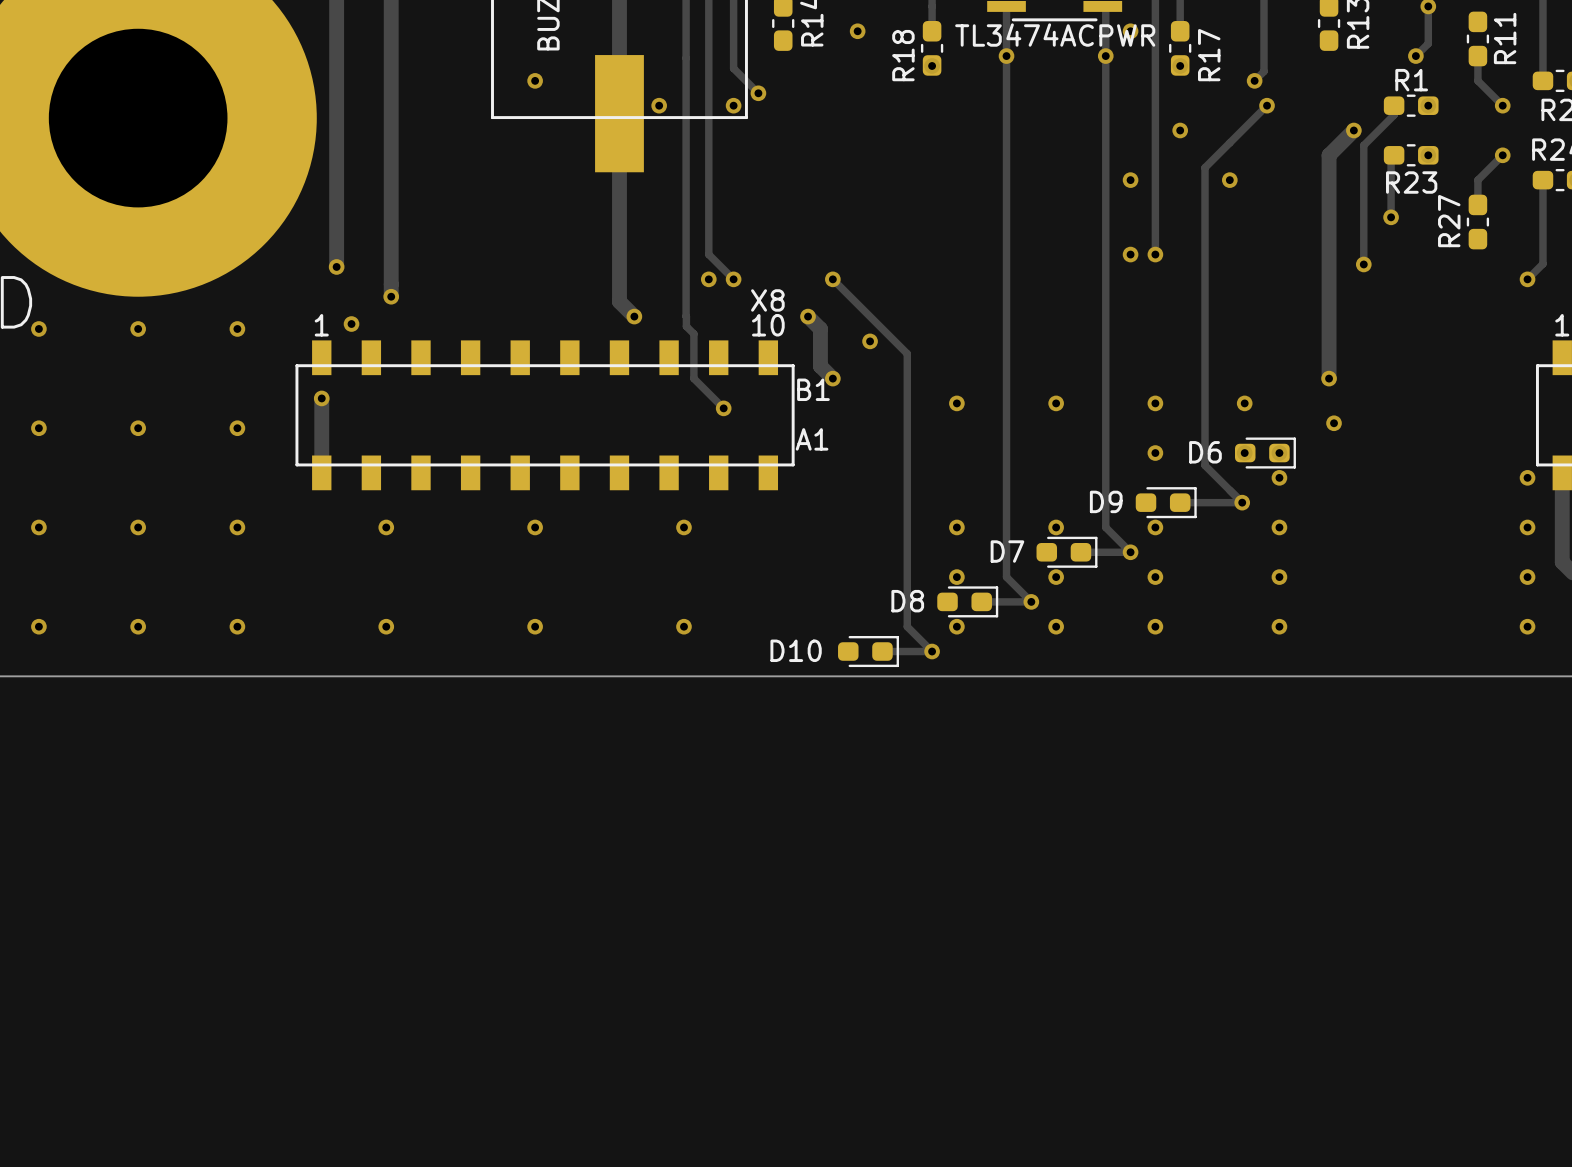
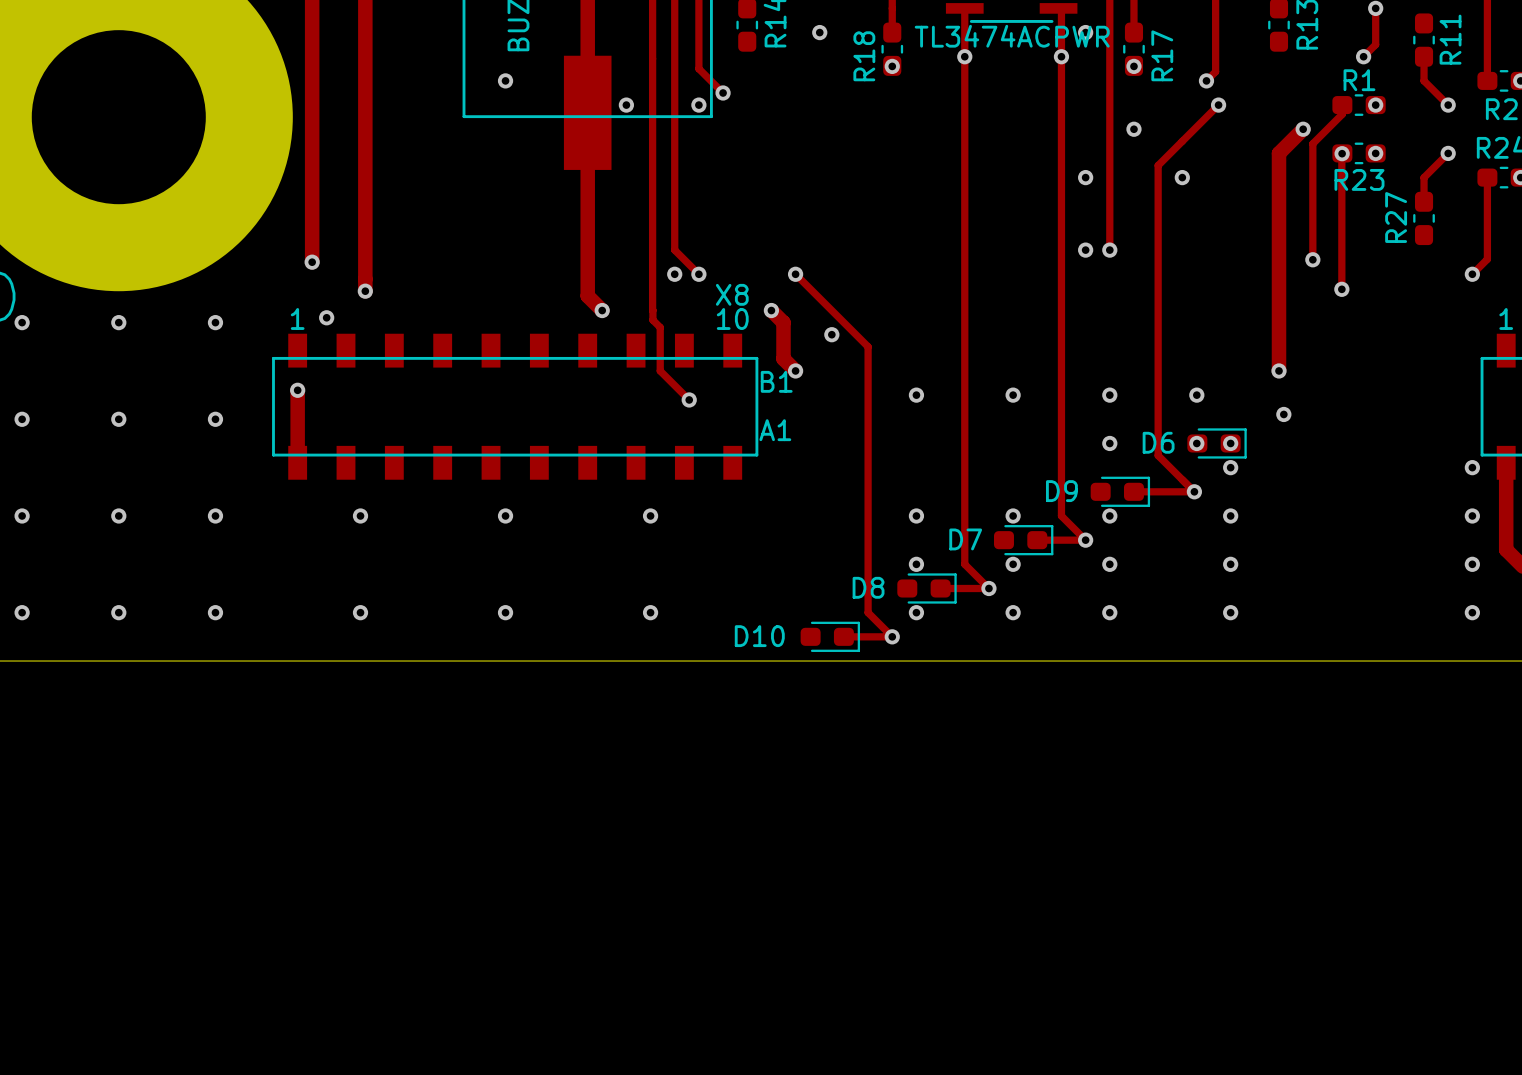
track: (1393, 155) (1391, 158) (1391, 217) -> (1341, 153) (1341, 289)
via: none -> (1342, 153)
via: (1391, 217) -> none
via: none -> (1341, 289)

